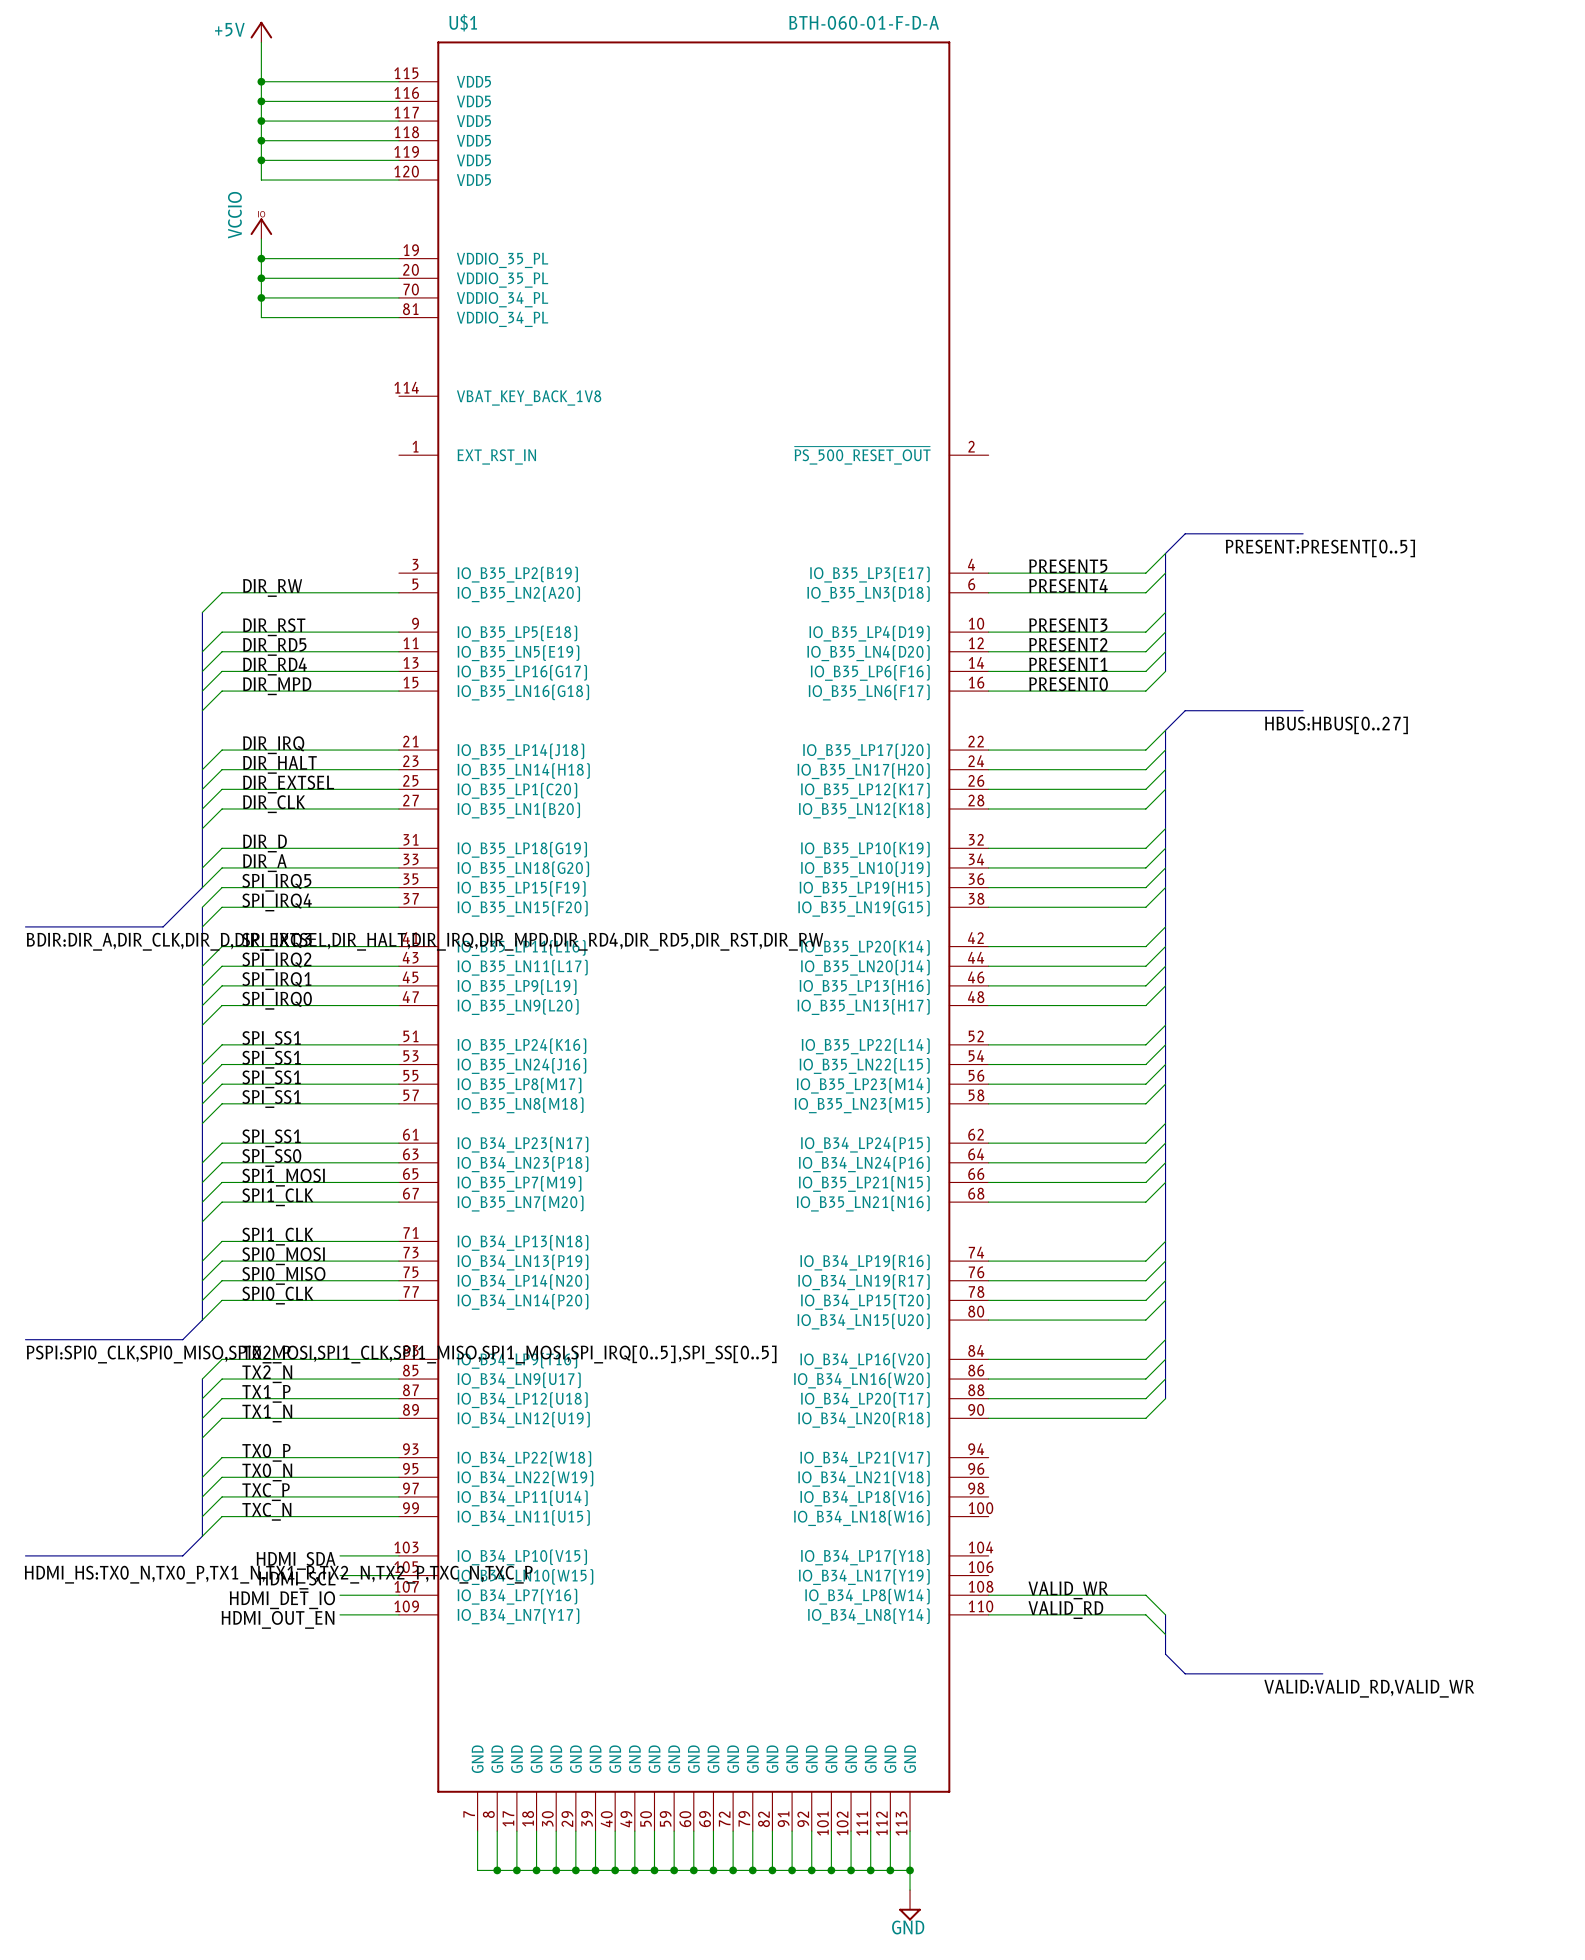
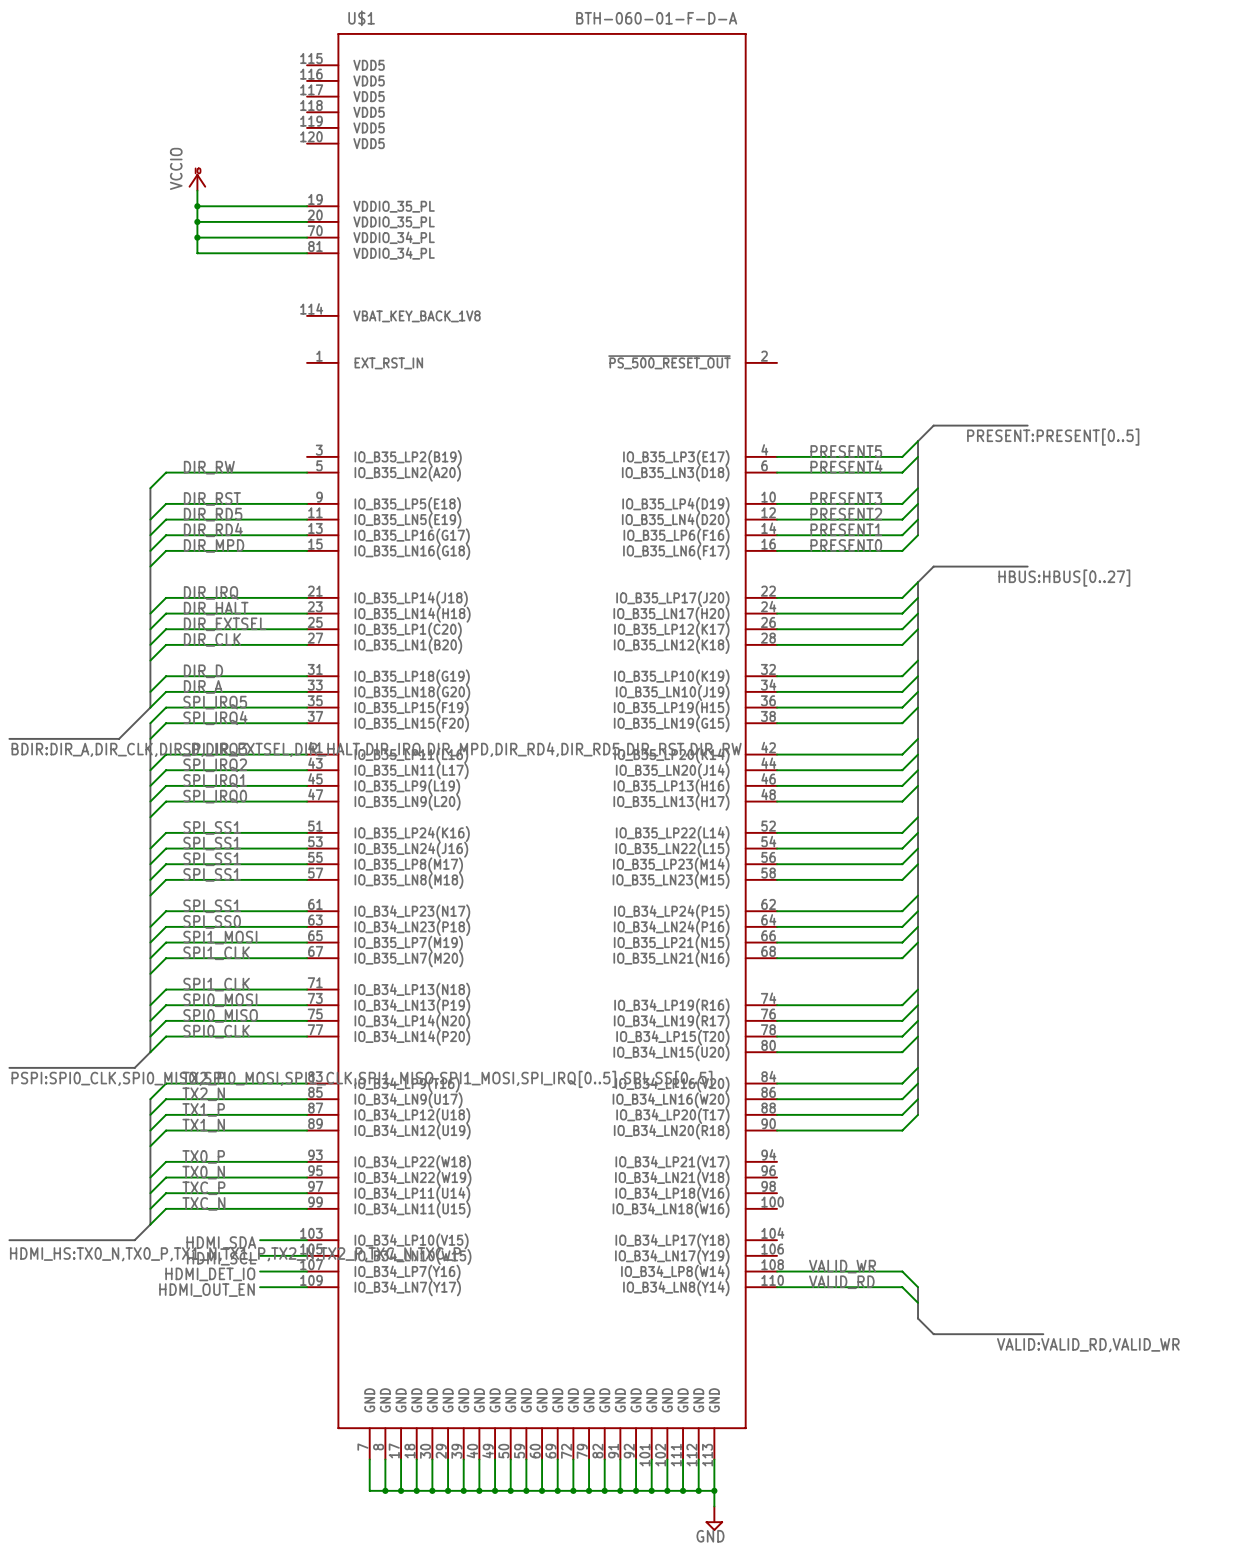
power symbol: +5V (261, 32) -> none
wire: (261, 42) (261, 180) (398, 180) -> none
wire: (261, 81) (398, 81) -> none
junction: (261, 81) -> none
wire: (261, 101) (398, 101) -> none
junction: (261, 101) -> none
wire: (261, 121) (398, 121) -> none
junction: (261, 121) -> none
wire: (261, 140) (398, 140) -> none
junction: (261, 140) -> none
wire: (261, 160) (398, 160) -> none
junction: (261, 160) -> none

